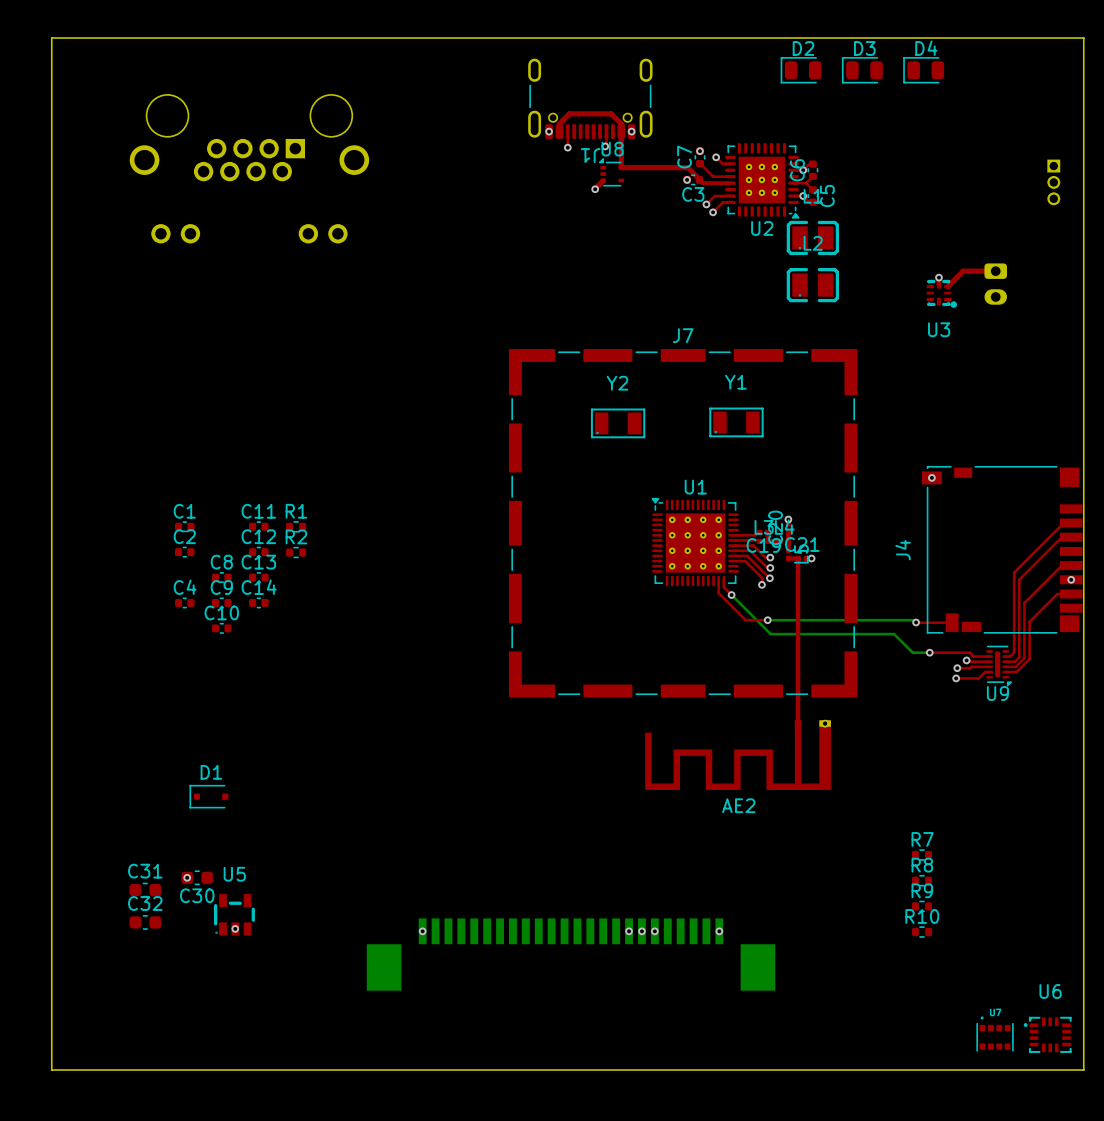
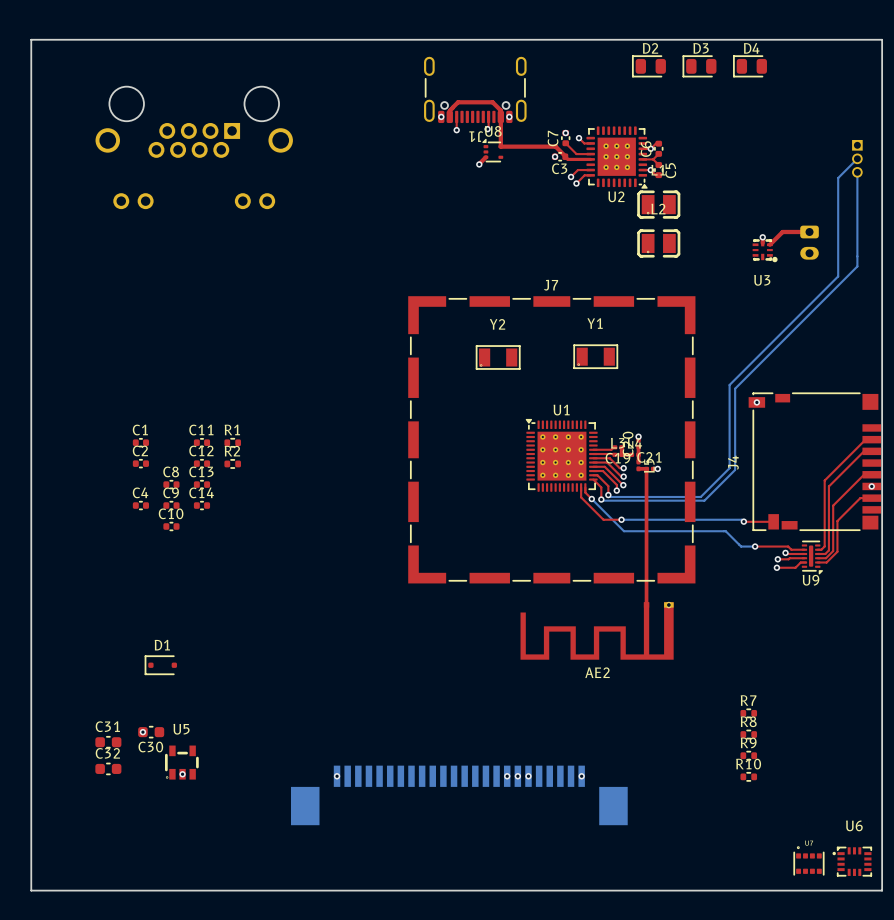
bottom track: none -> (857, 158) (838, 178) (838, 276) (729, 384) (729, 468) (700, 496) (610, 496) (608, 495)
bottom track: none -> (857, 172) (857, 266) (735, 388) (735, 469) (704, 500) (601, 499)
top track: none -> (593, 475) (597, 475) (608, 486) (608, 495)
top track: none -> (593, 479) (601, 487) (601, 499)
via: none -> (608, 495)
via: none -> (601, 499)

